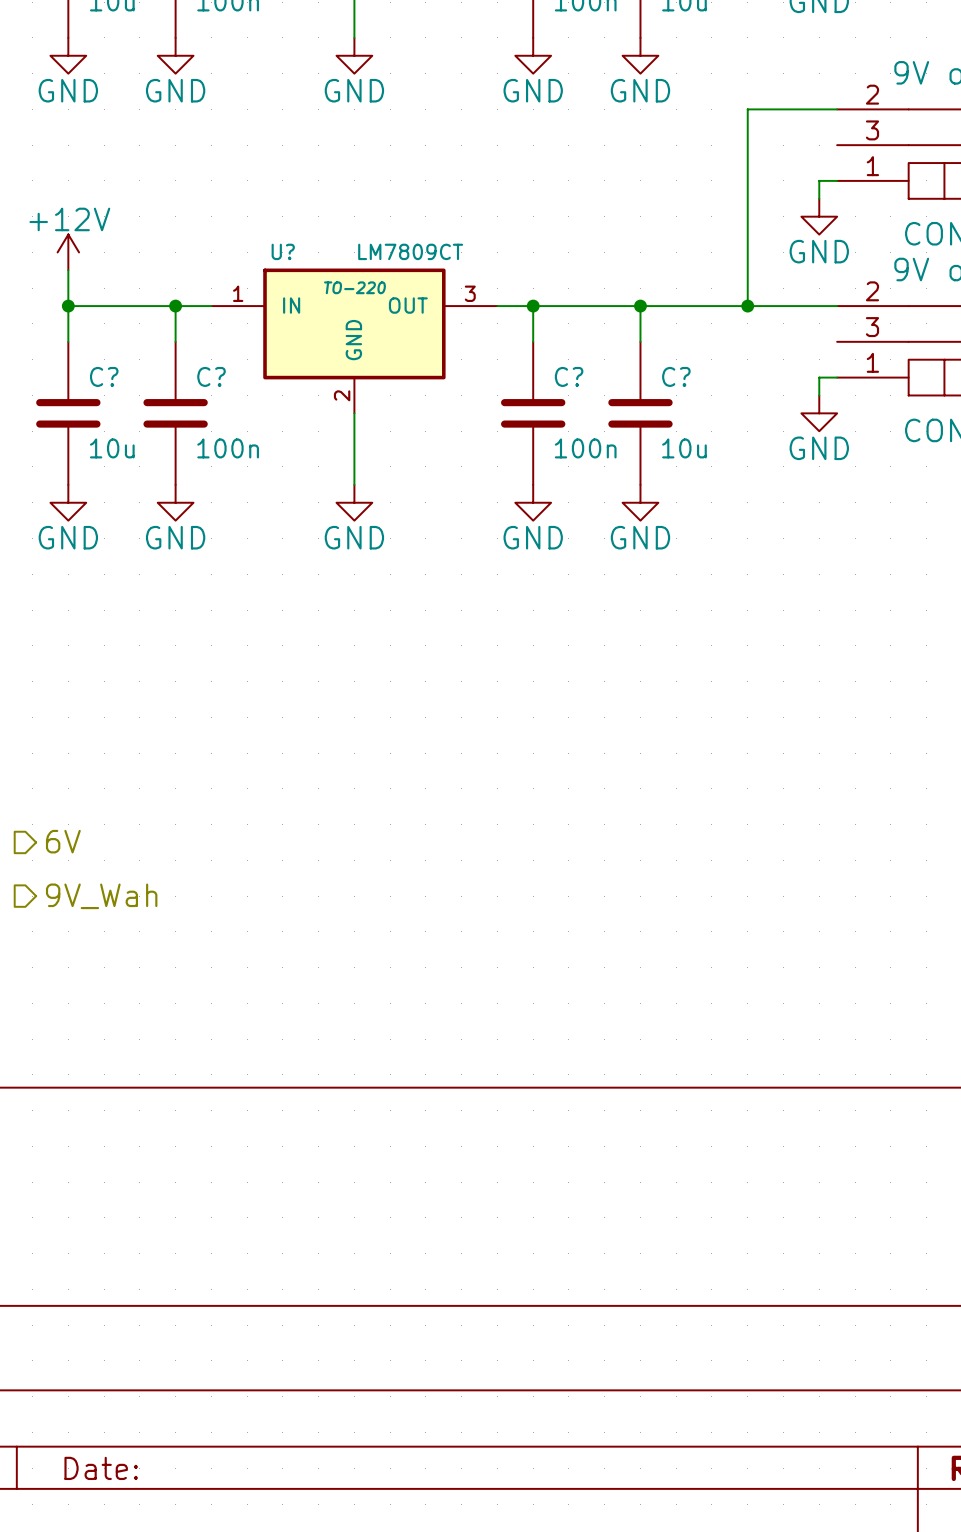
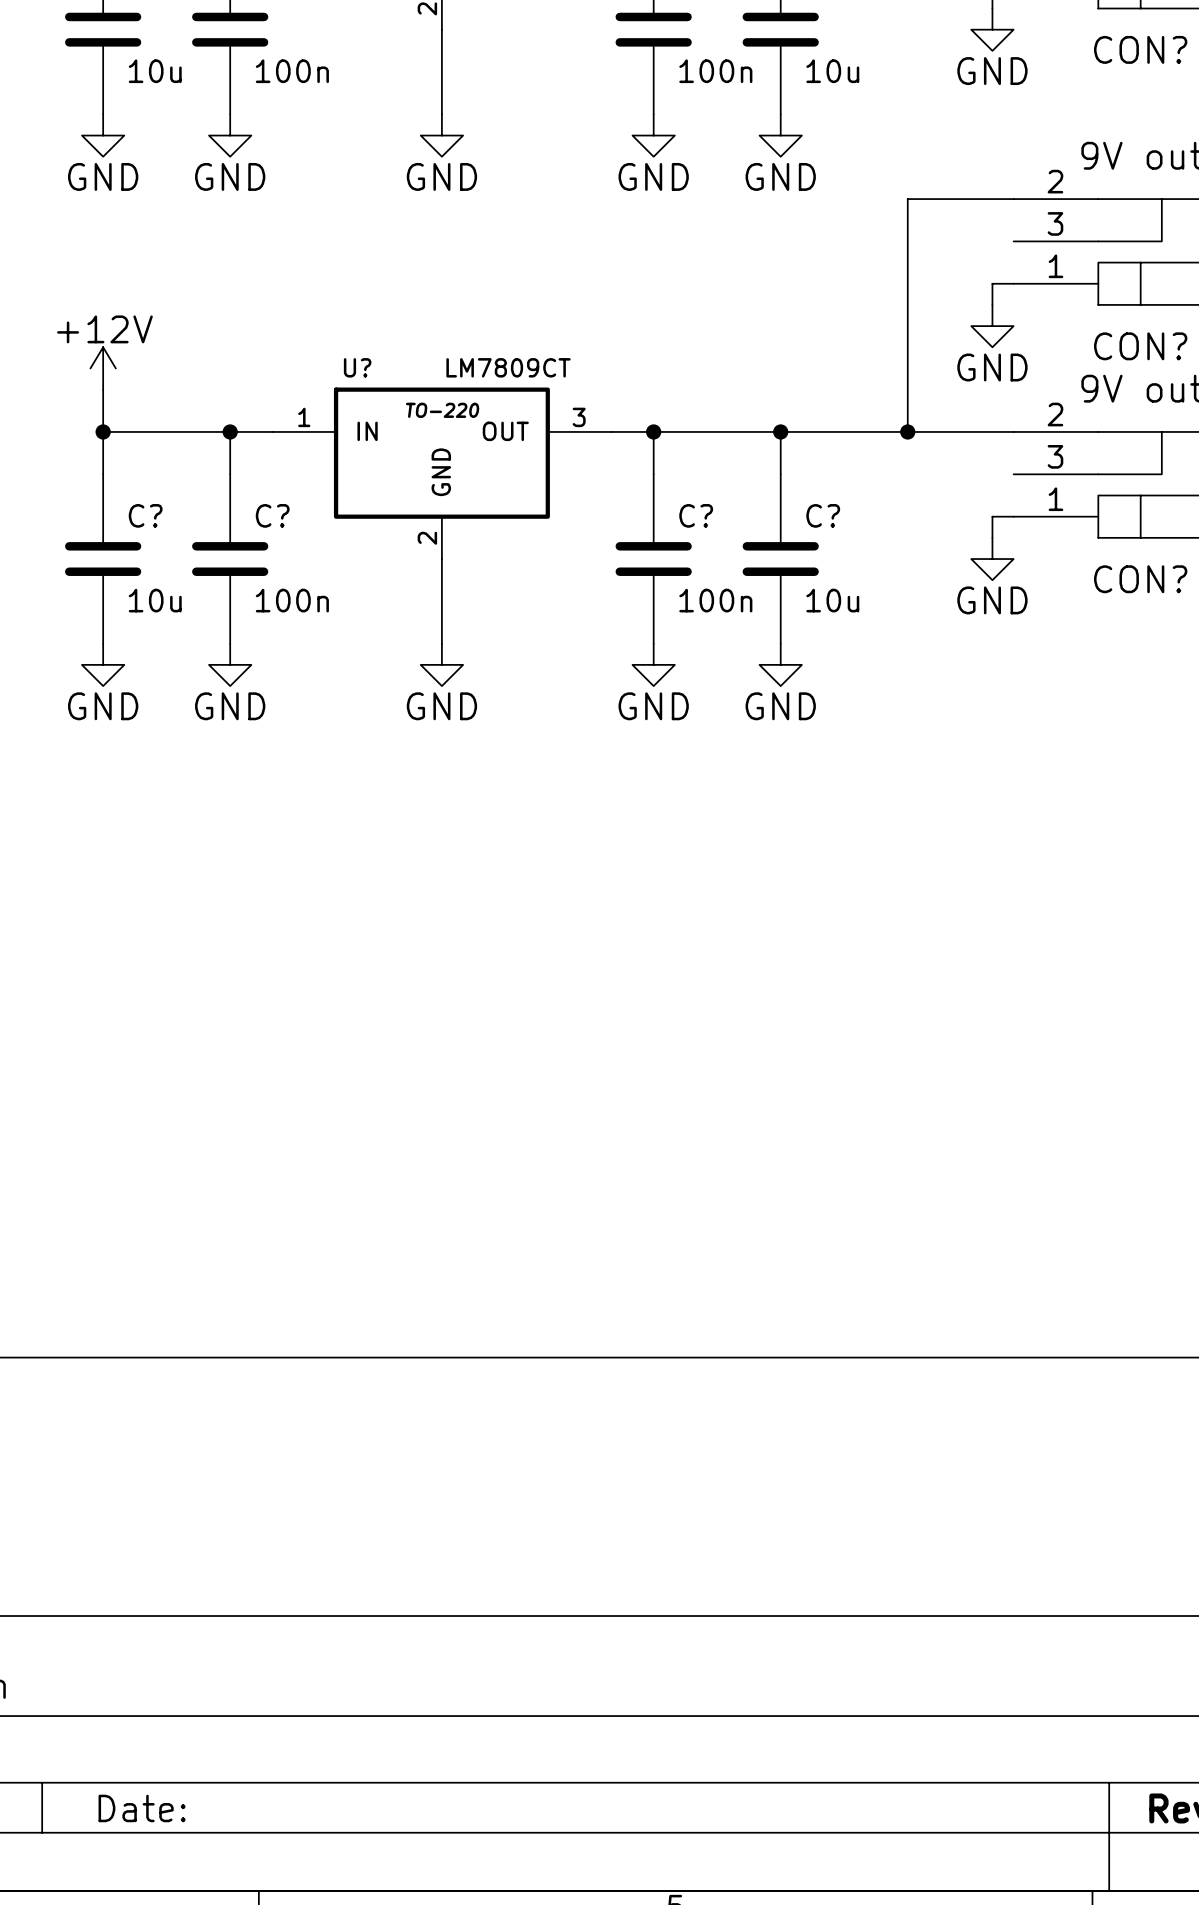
hierarchical label: 6V (63, 841) -> none
hierarchical label: 9V_Wah (101, 896) -> none

